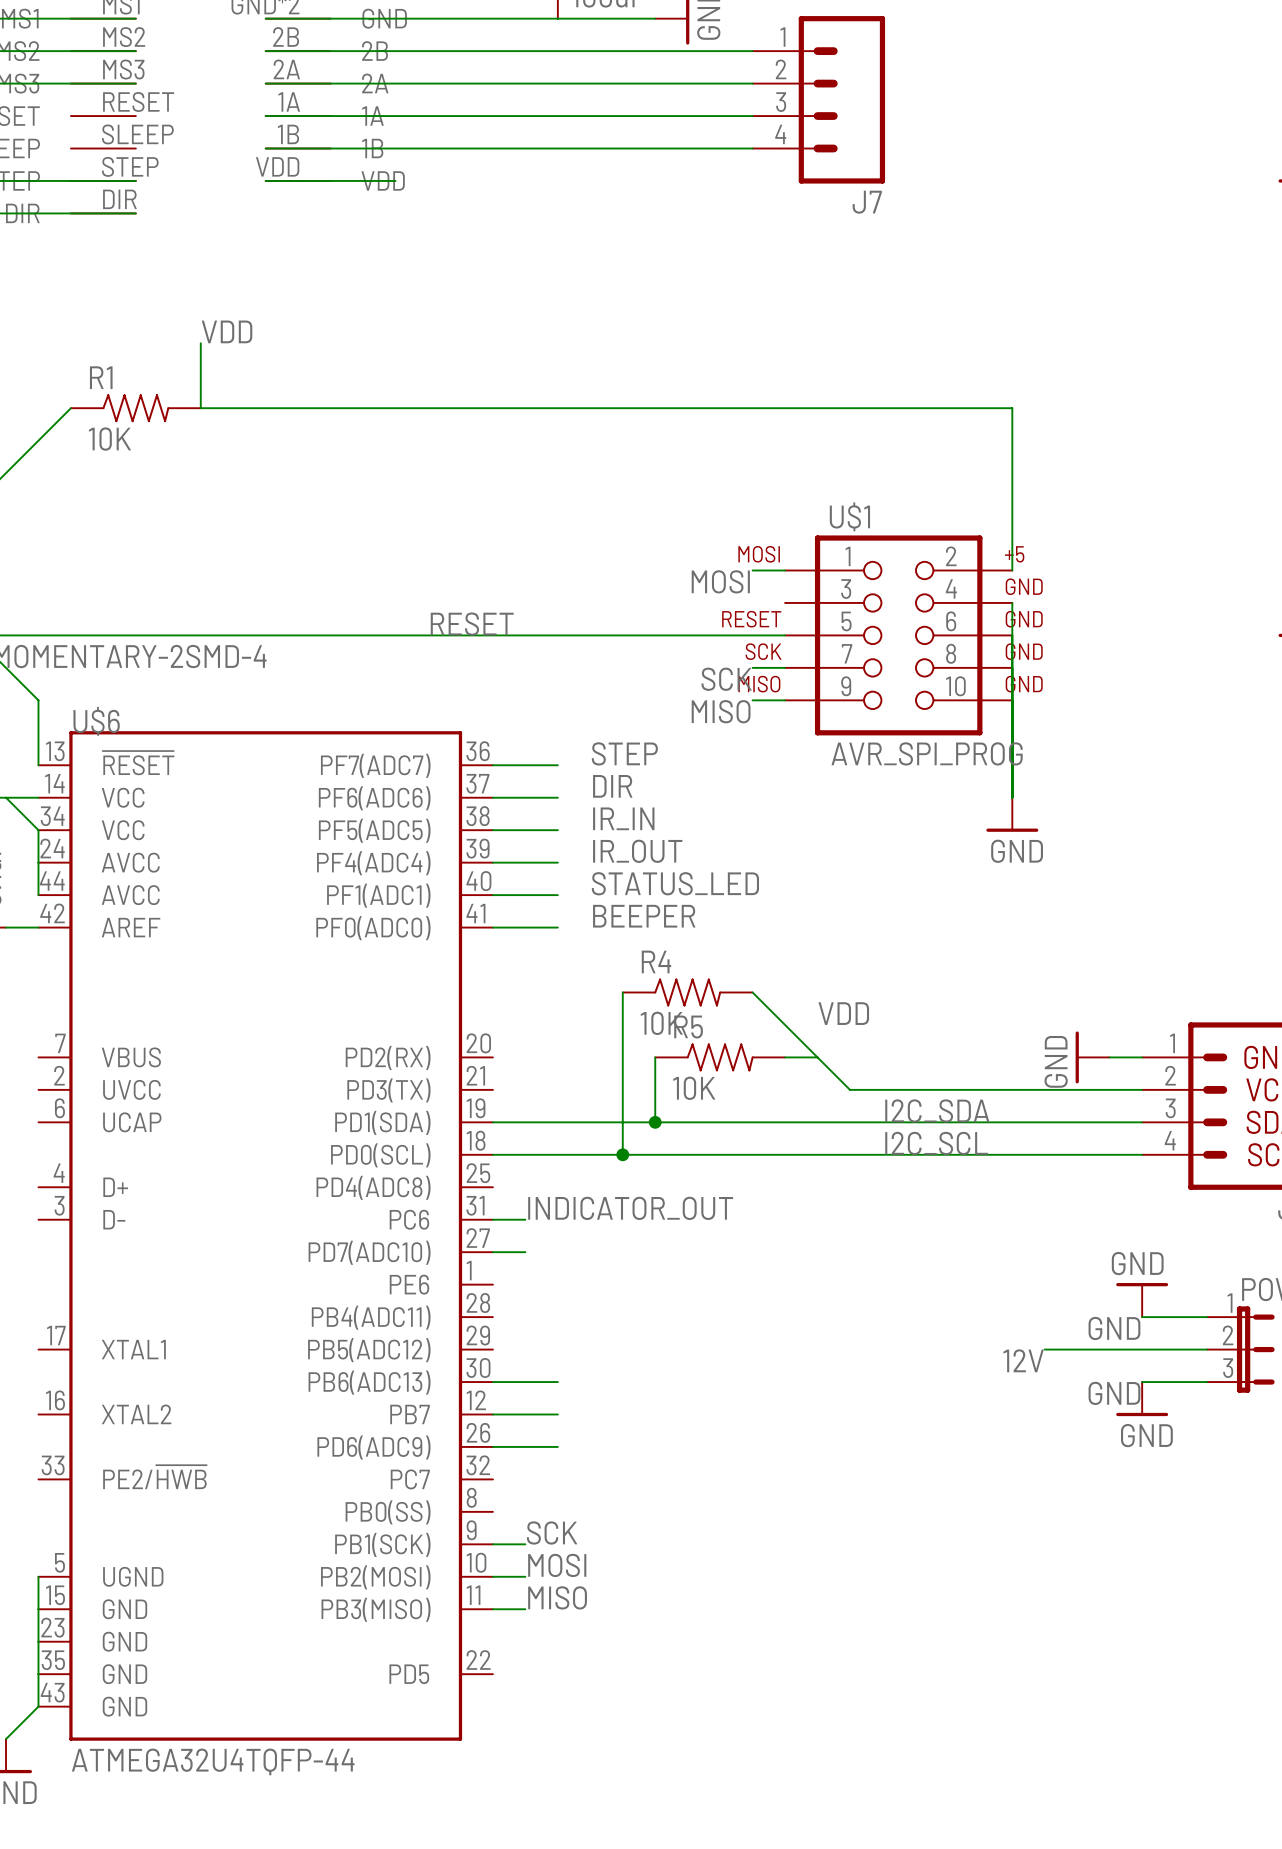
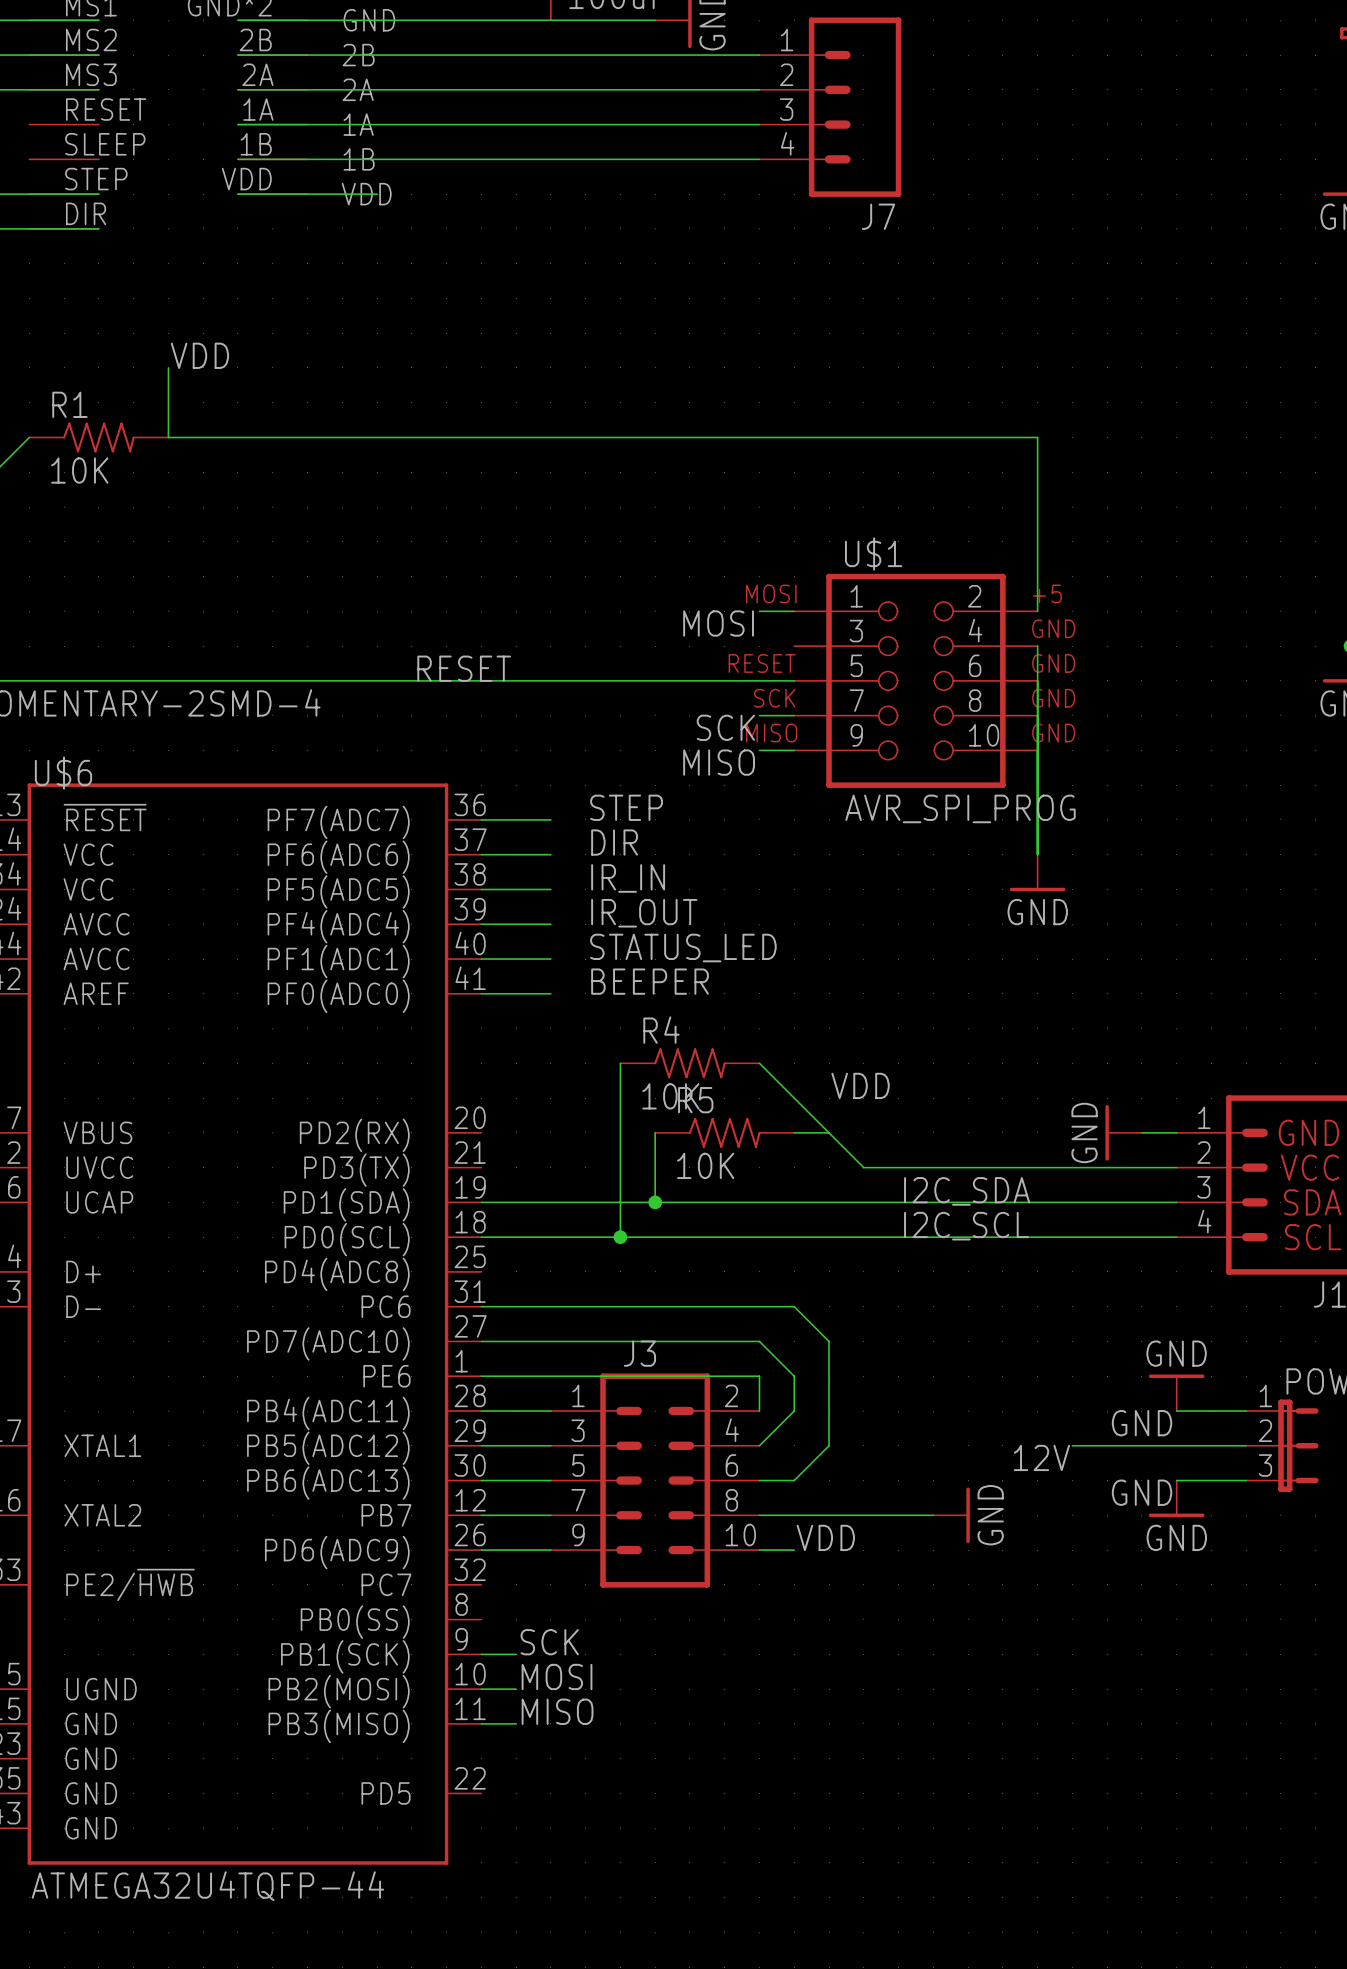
label: INDICATOR_OUT (630, 1208) -> none
wire: none -> (516, 1306) (794, 1306) (829, 1341) (829, 1445) (794, 1480) (759, 1480)
wire: none -> (516, 1341) (759, 1341) (794, 1376) (794, 1411) (759, 1445)
wire: none -> (481, 1376) (759, 1376) (759, 1411)
wire: none -> (481, 1411) (550, 1411)
wire: none -> (481, 1445) (550, 1445)
J3: none -> (655, 1480)
wire: none -> (759, 1515) (933, 1515)
power symbol: none -> GND (951, 1515)
label: none -> VDD (825, 1537)
wire: none -> (759, 1550) (794, 1550)

